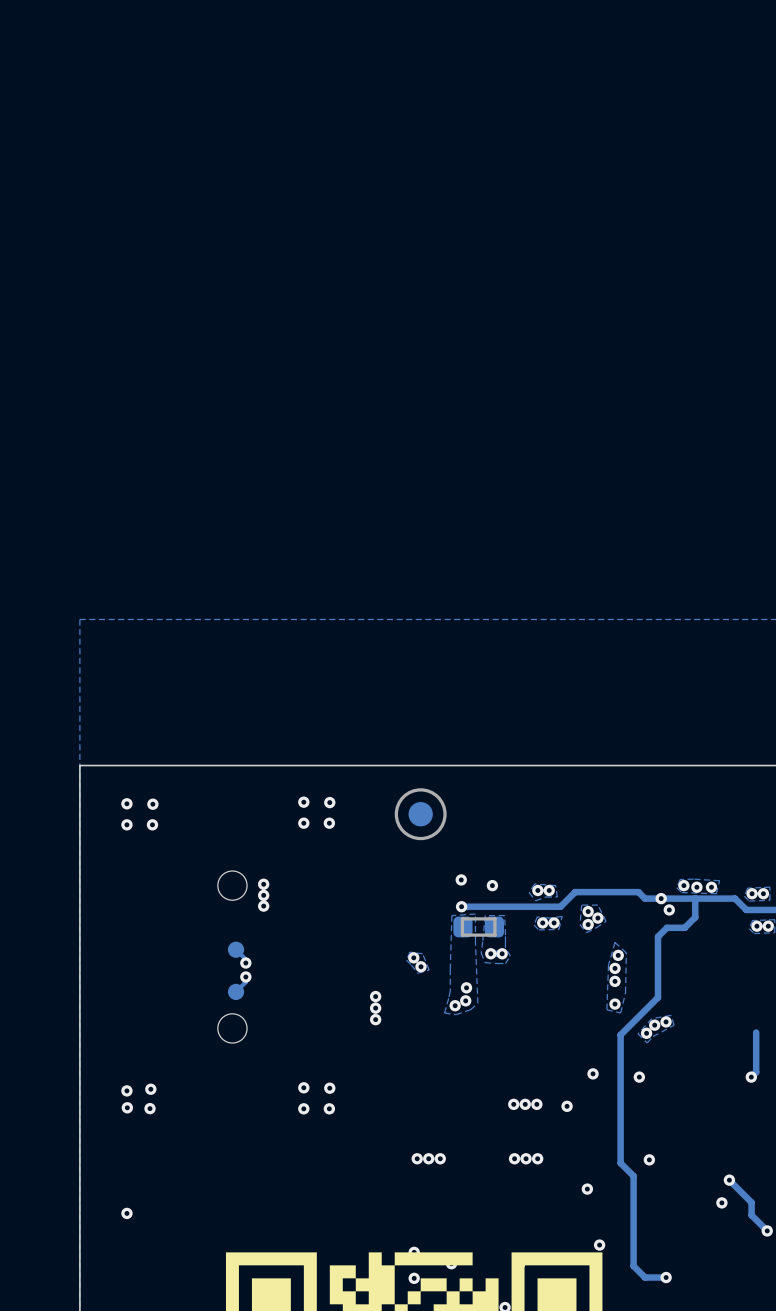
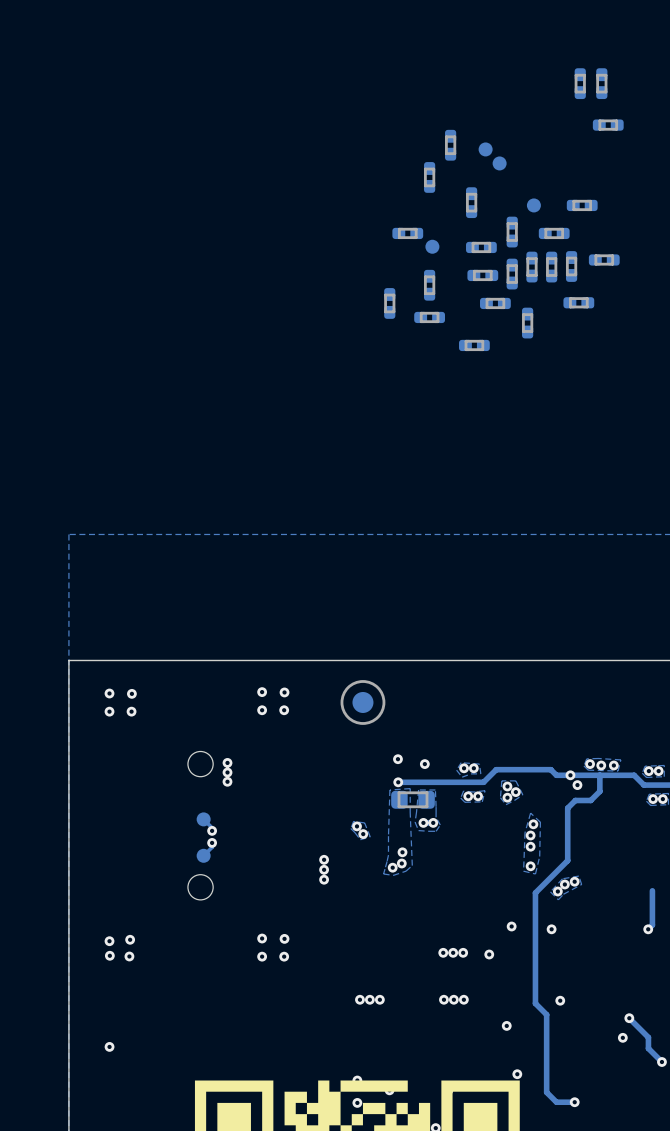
part: none -> (580, 83)
part: none -> (601, 83)
part: none -> (608, 125)
part: none -> (450, 145)
part: none -> (485, 149)
part: none -> (499, 163)
part: none -> (429, 177)
part: none -> (471, 202)
part: none -> (533, 205)
part: none -> (582, 205)
part: none -> (512, 232)
part: none -> (407, 233)
part: none -> (554, 233)
part: none -> (432, 246)
part: none -> (481, 247)
part: none -> (604, 259)
part: none -> (571, 266)
part: none -> (531, 267)
part: none -> (551, 267)
part: none -> (512, 274)
part: none -> (482, 275)
part: none -> (429, 285)
part: none -> (578, 302)
part: none -> (389, 303)
part: none -> (495, 303)
part: none -> (429, 317)
part: none -> (527, 323)
part: none -> (474, 345)

